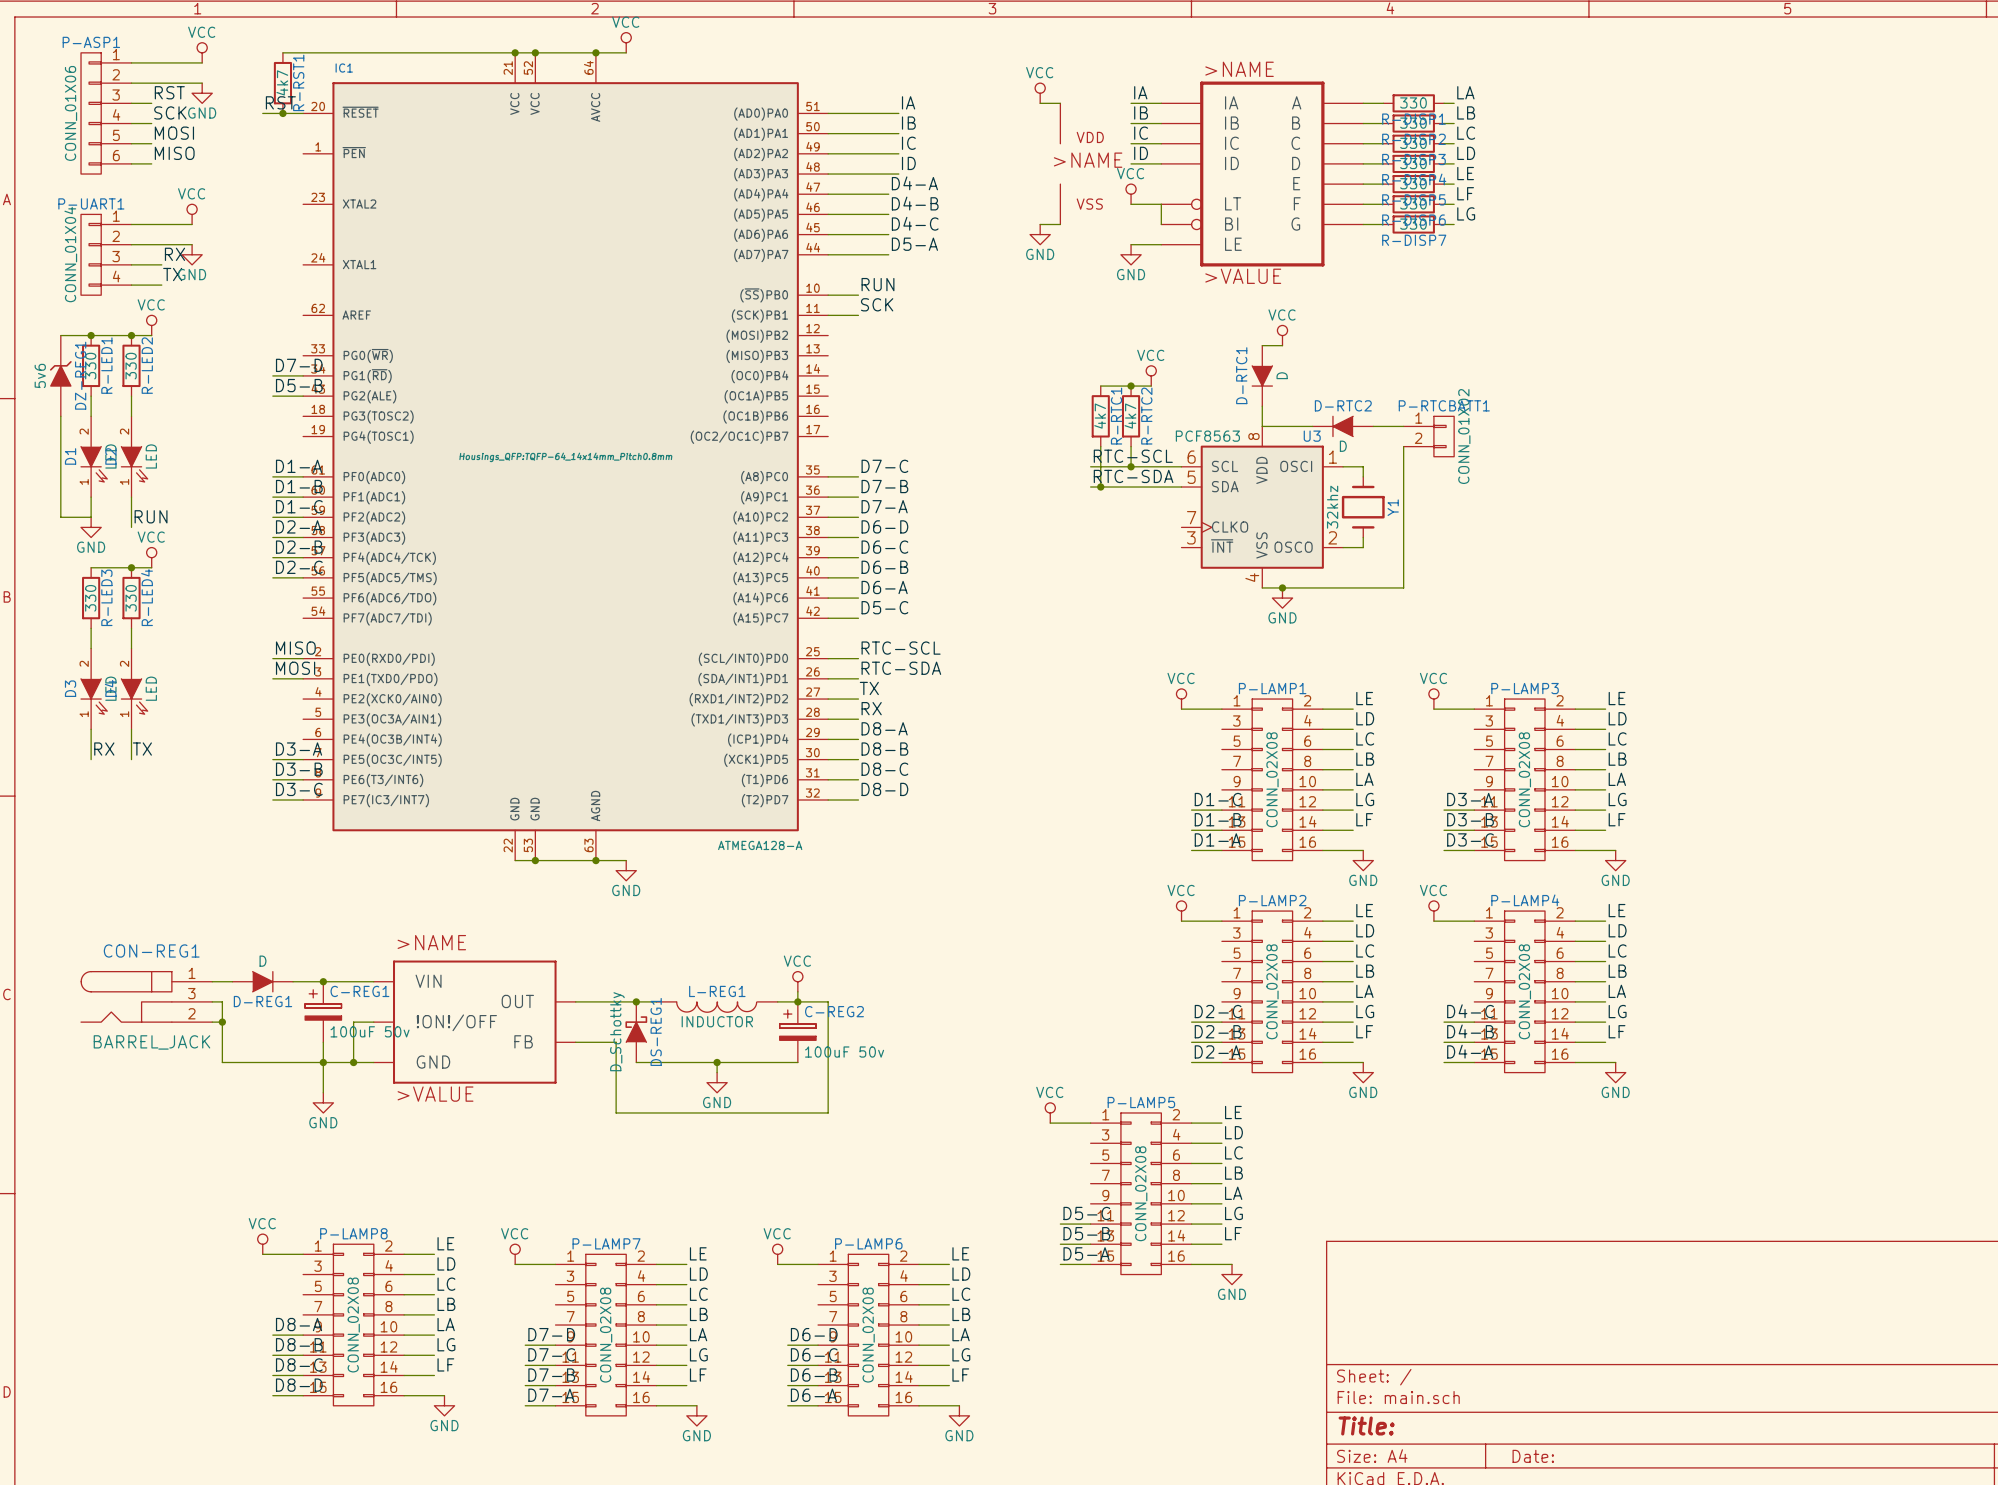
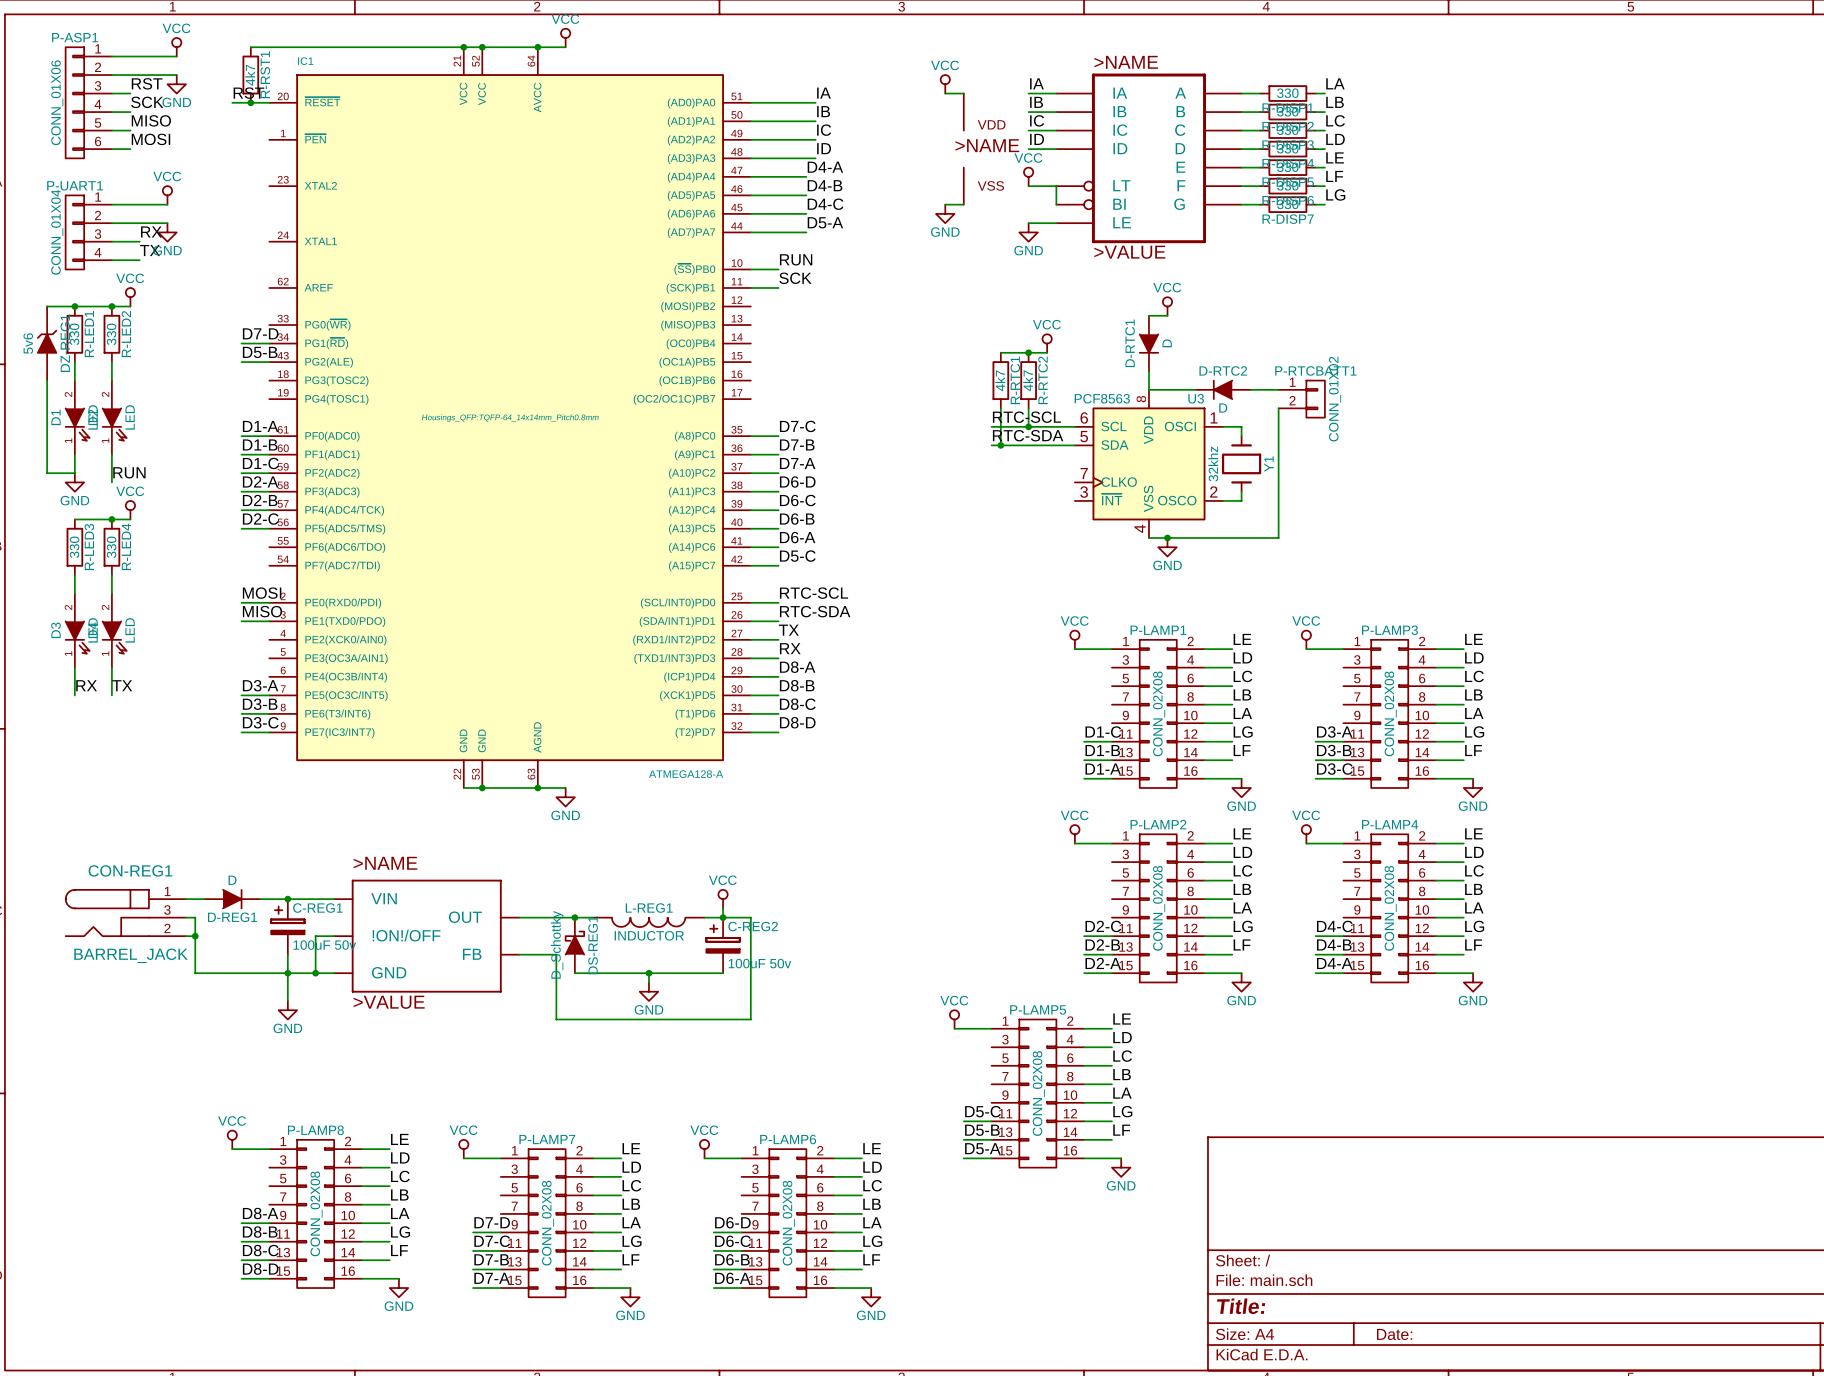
label: MOSI (174, 133) -> MISO (151, 120)
label: MISO (174, 153) -> MOSI (150, 139)
label: MISO (295, 648) -> MOSI (262, 593)
label: MOSI (295, 668) -> MISO (262, 611)

